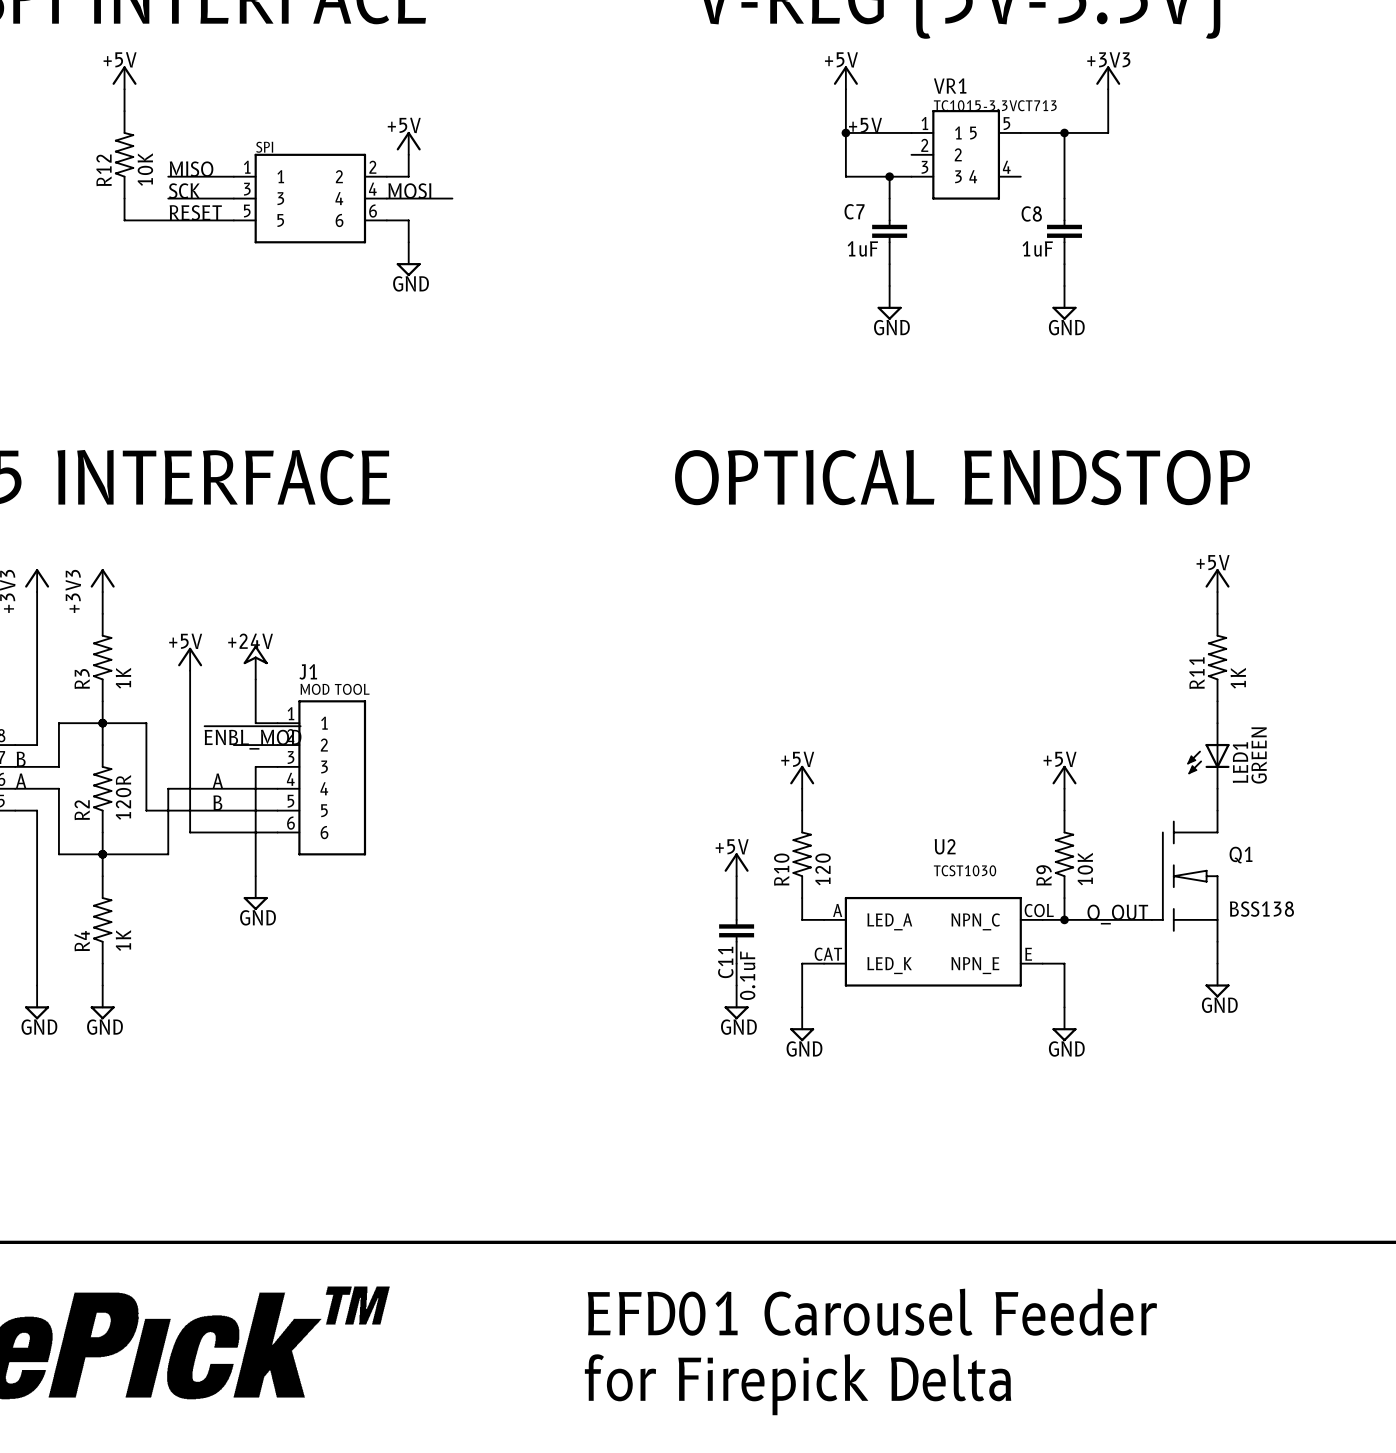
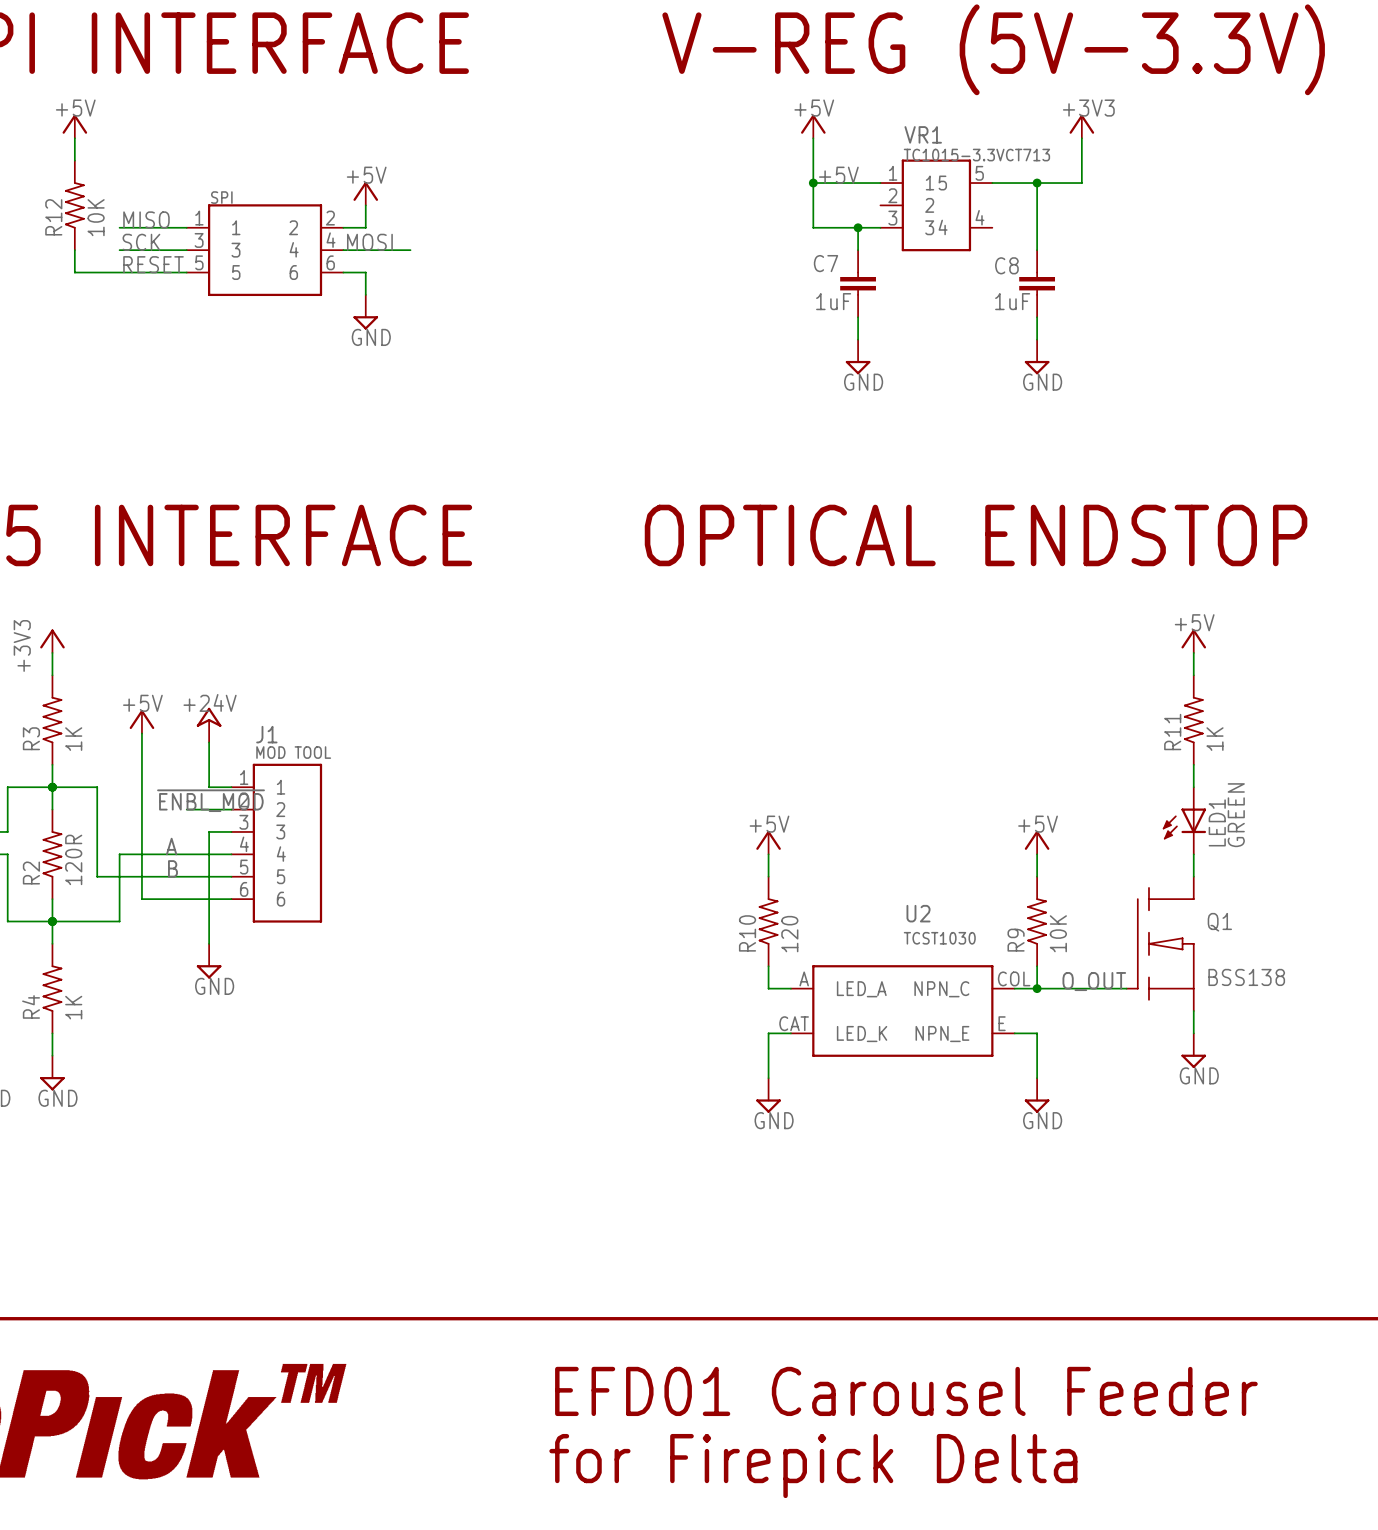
power symbol: +5V (736, 864) -> none
wire: (736, 876) (736, 898) -> none
C11: 0.1uF (736, 930) -> none
wire: (736, 963) (736, 985) -> none
power symbol: GND (736, 1002) -> none

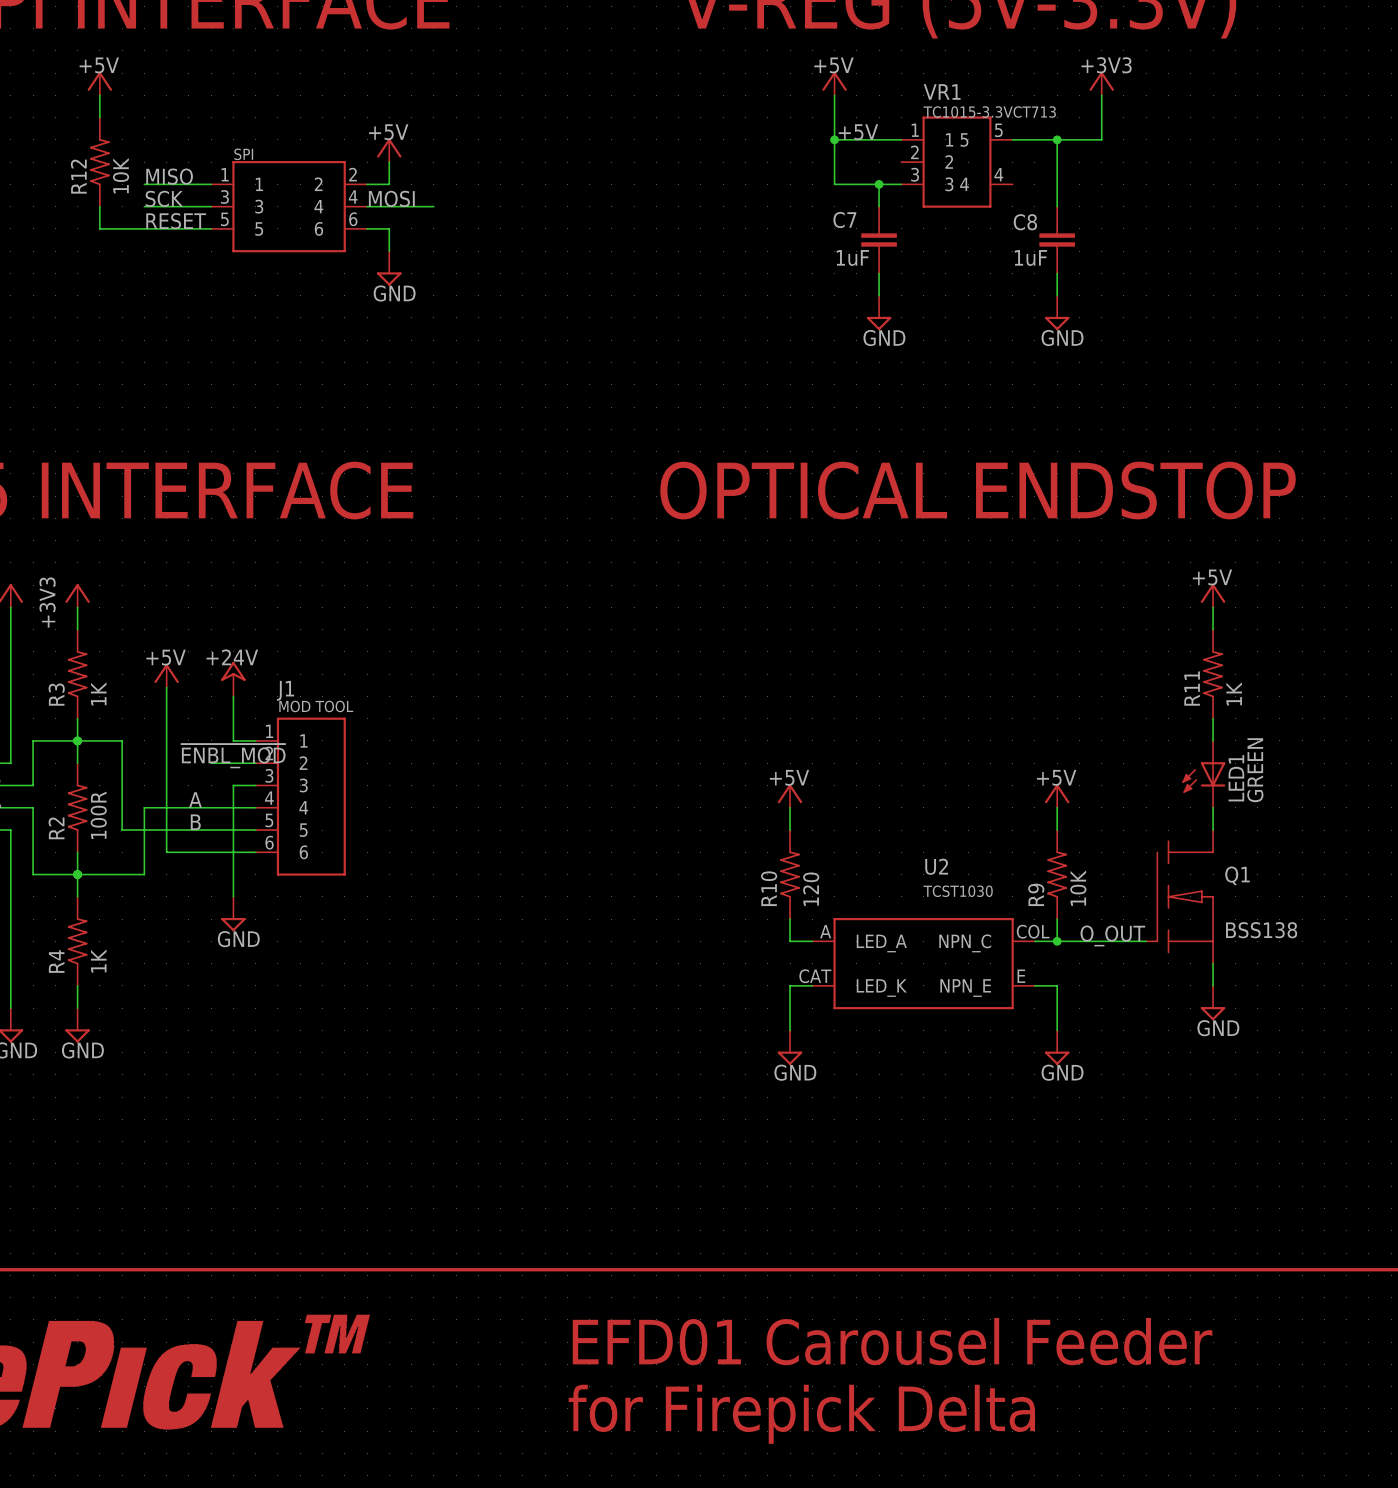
R2 value: 120R (73, 859) -> 100R (98, 815)

